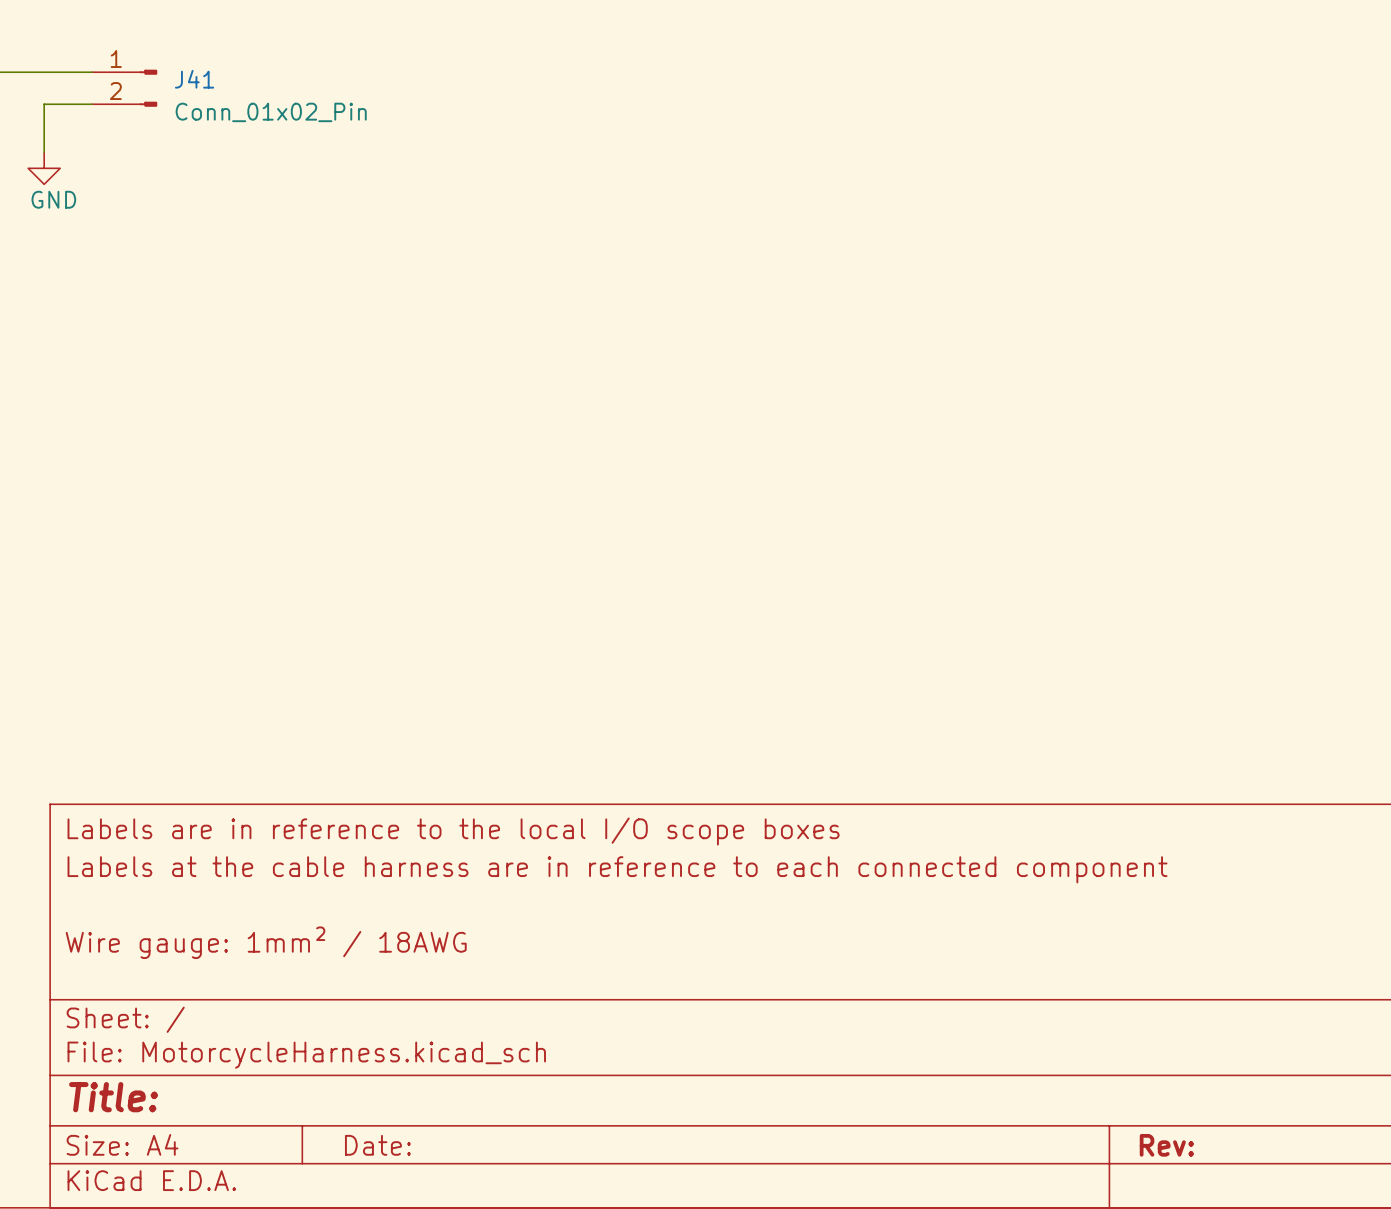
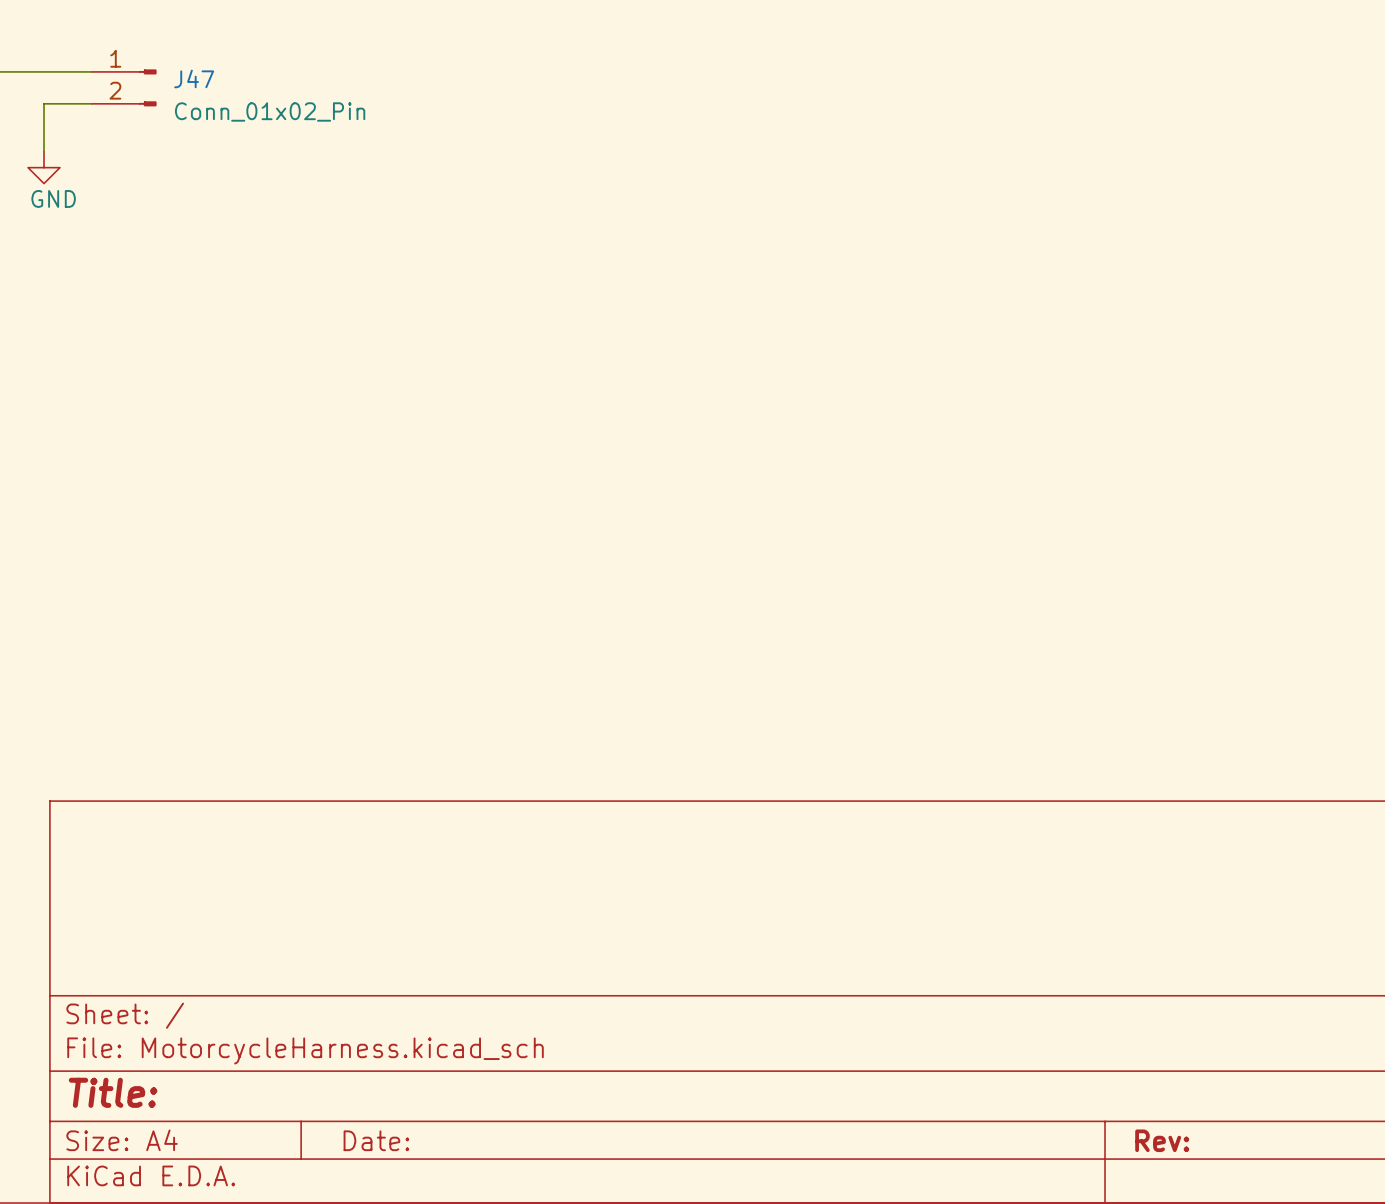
J41 name: J41 (194, 79) -> J47 (194, 78)
title block: Labels are in reference to the local I/O scope boxes (453, 831) -> none
title block: Labels at the cable harness are in reference to each connected component (617, 869) -> none
title block: Wire gauge: 1mm² / 18AWG (266, 942) -> none

